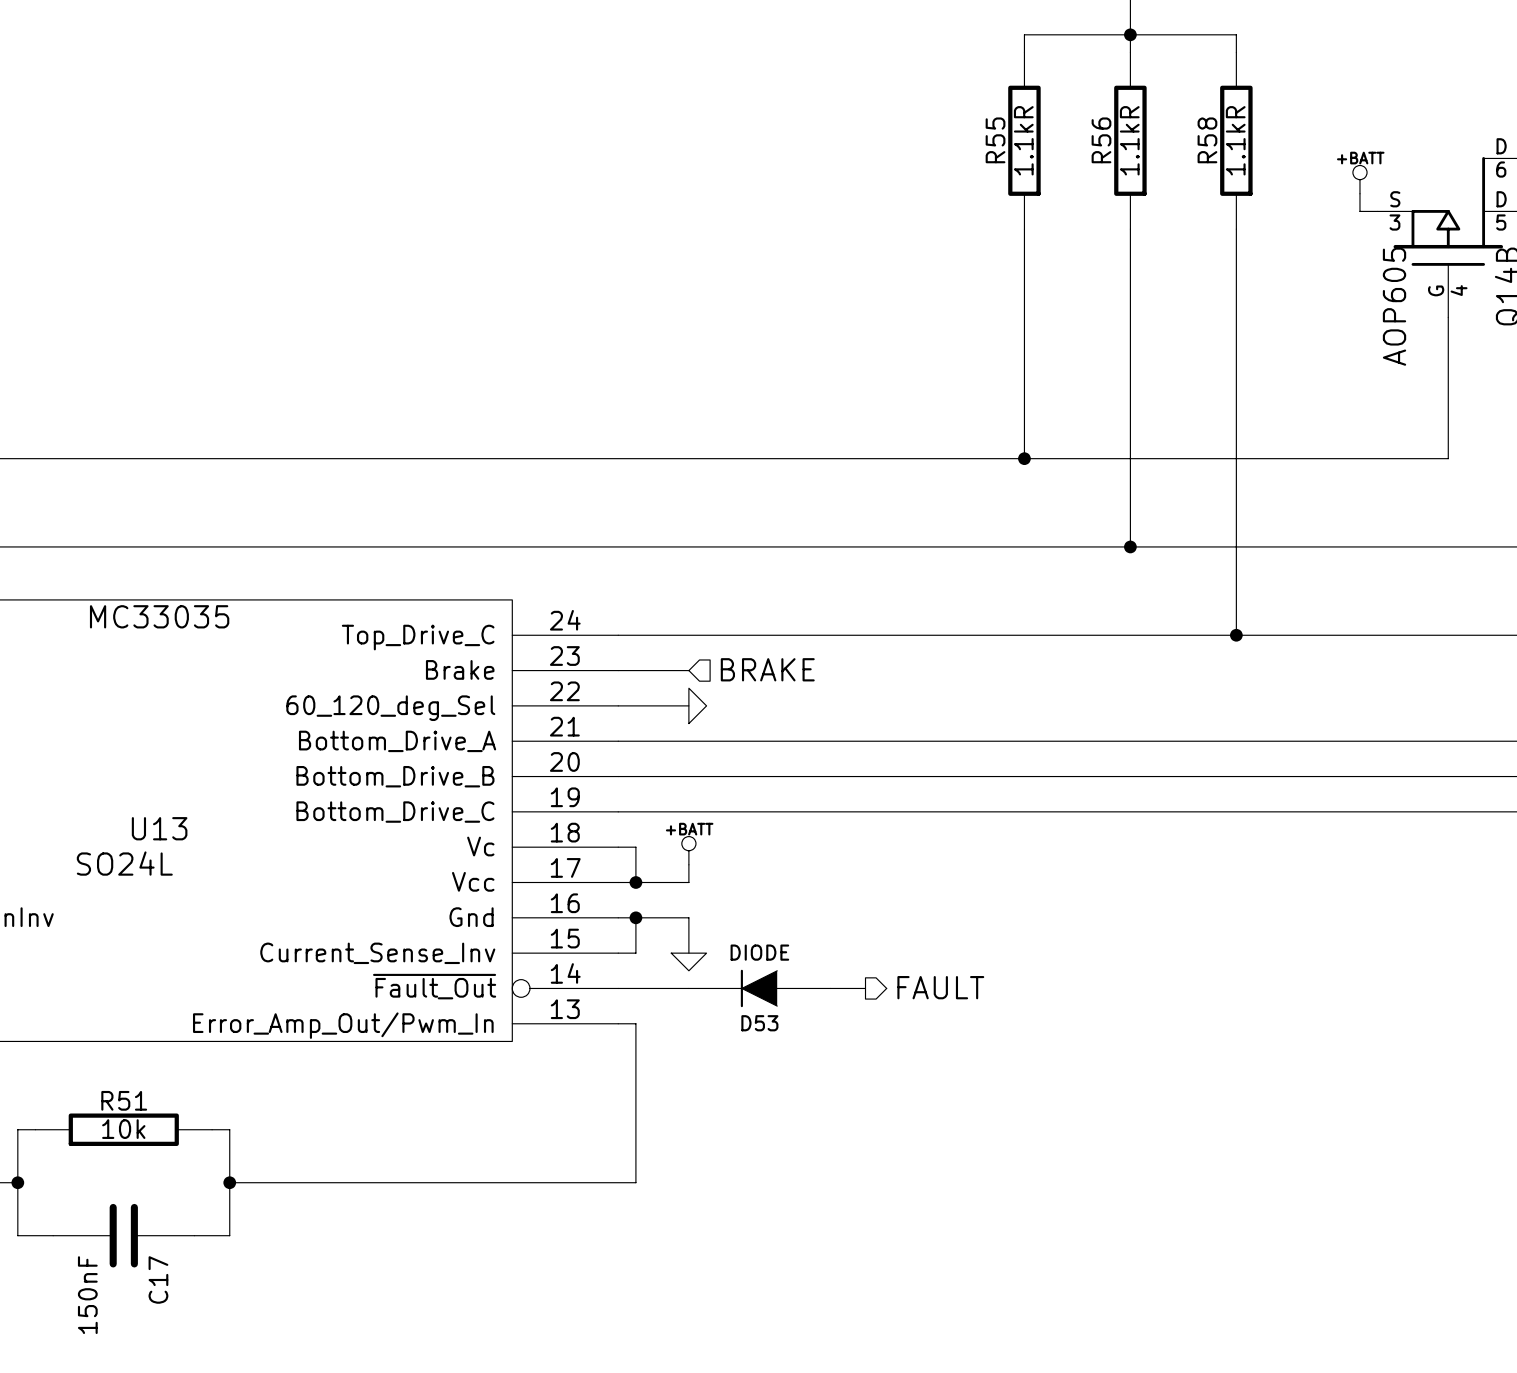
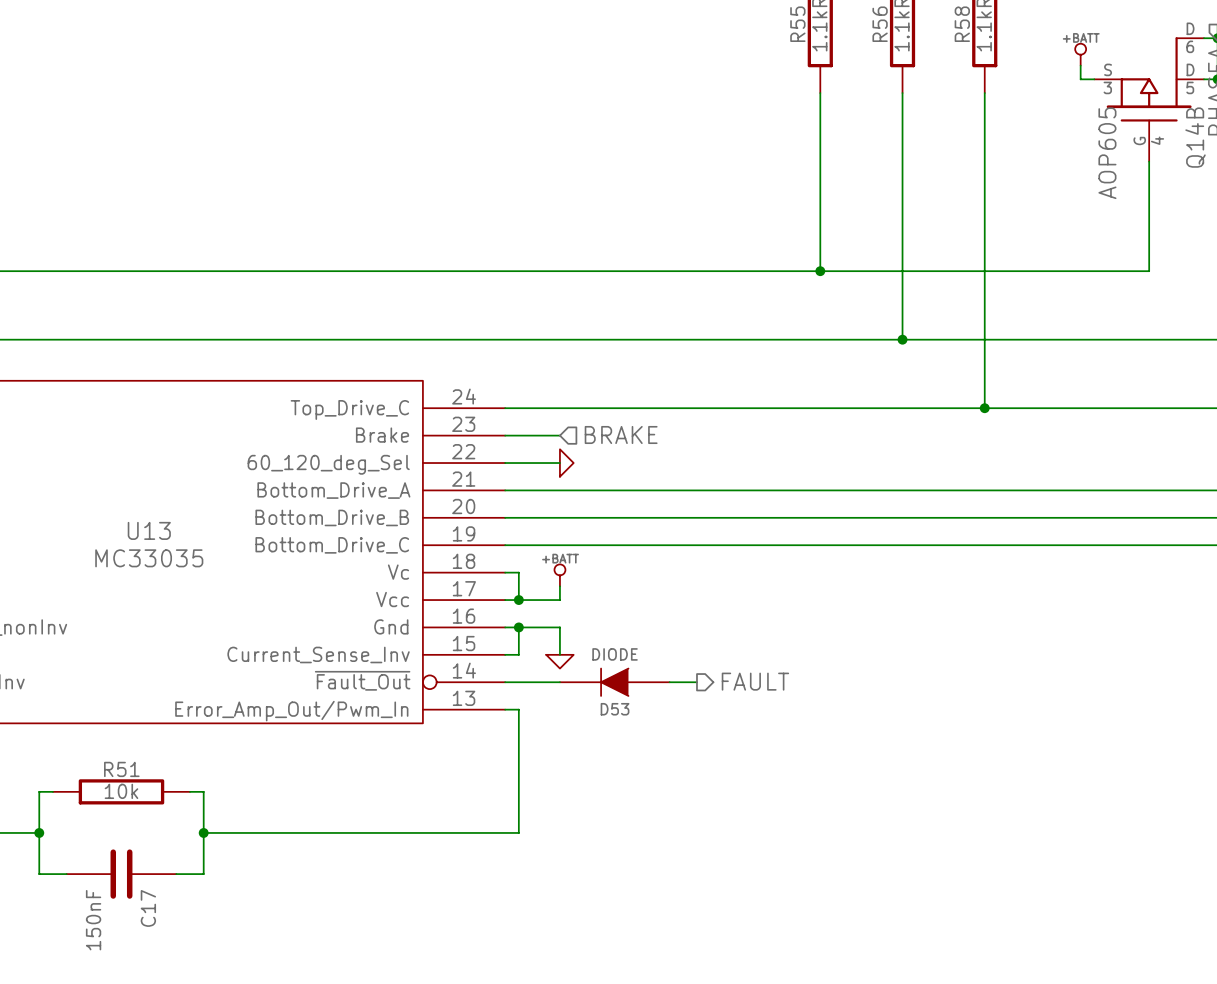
U13 value position: MC33035 (159, 616) -> MC33035 (149, 558)
U13 name position: U13 (159, 828) -> U13 (149, 530)
U13 text: SO24L (124, 863) -> none

